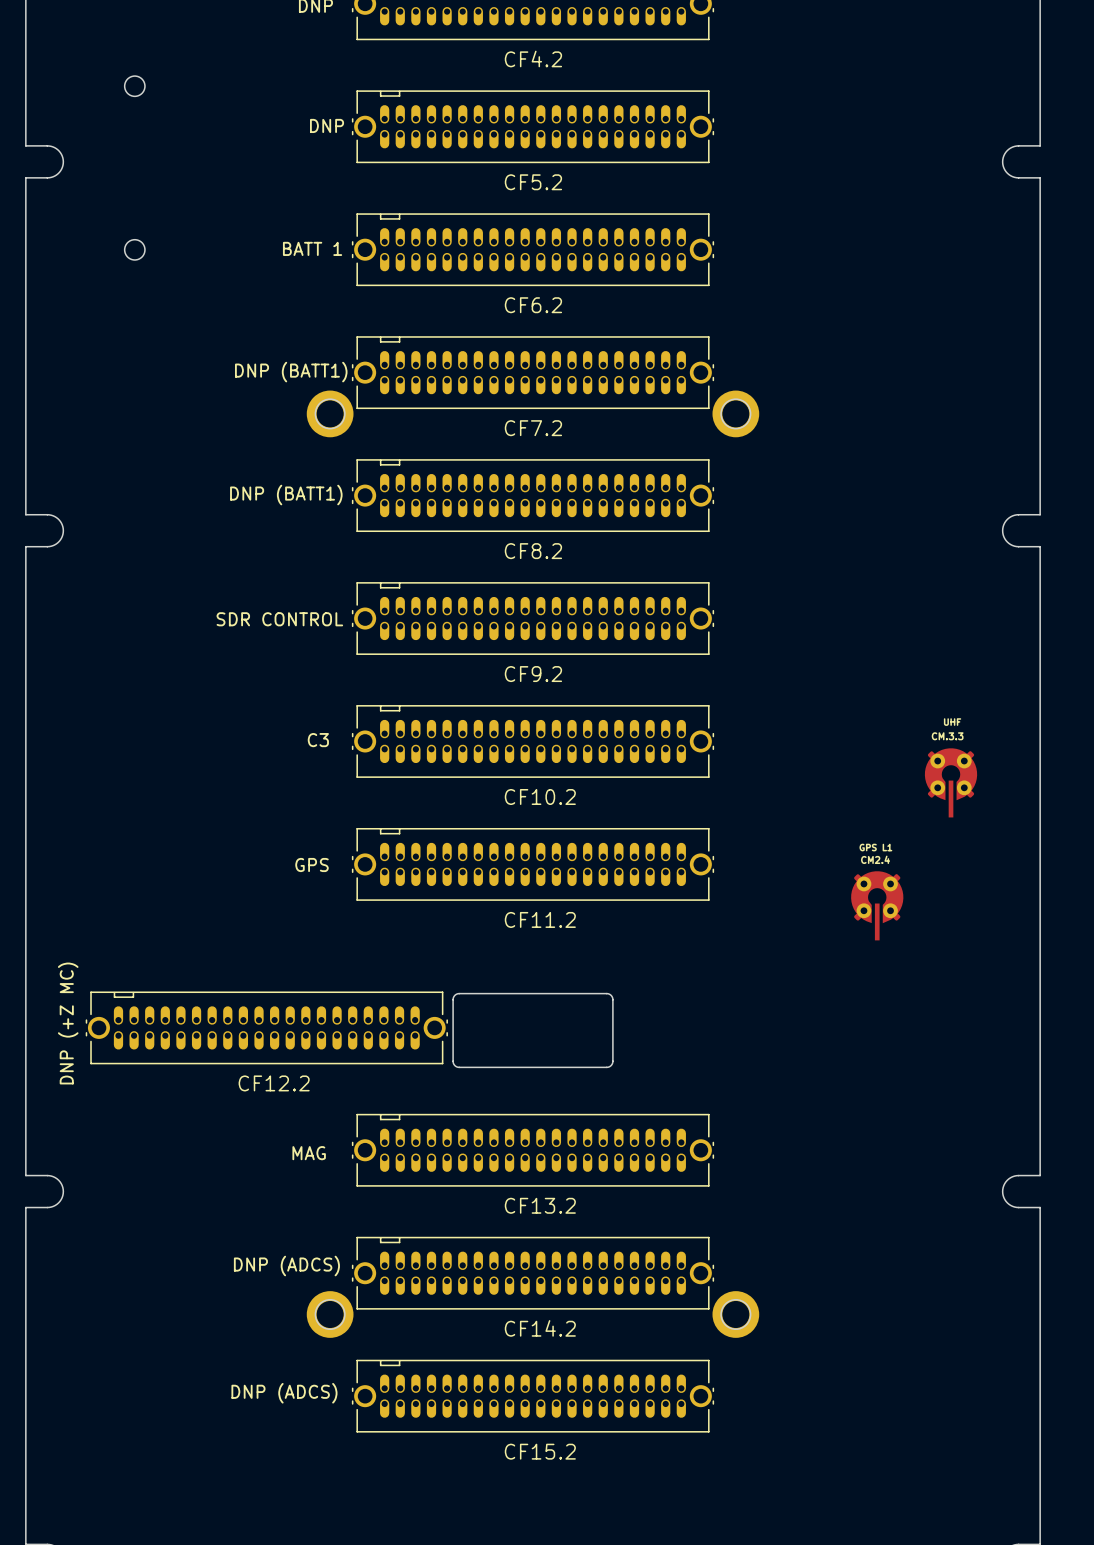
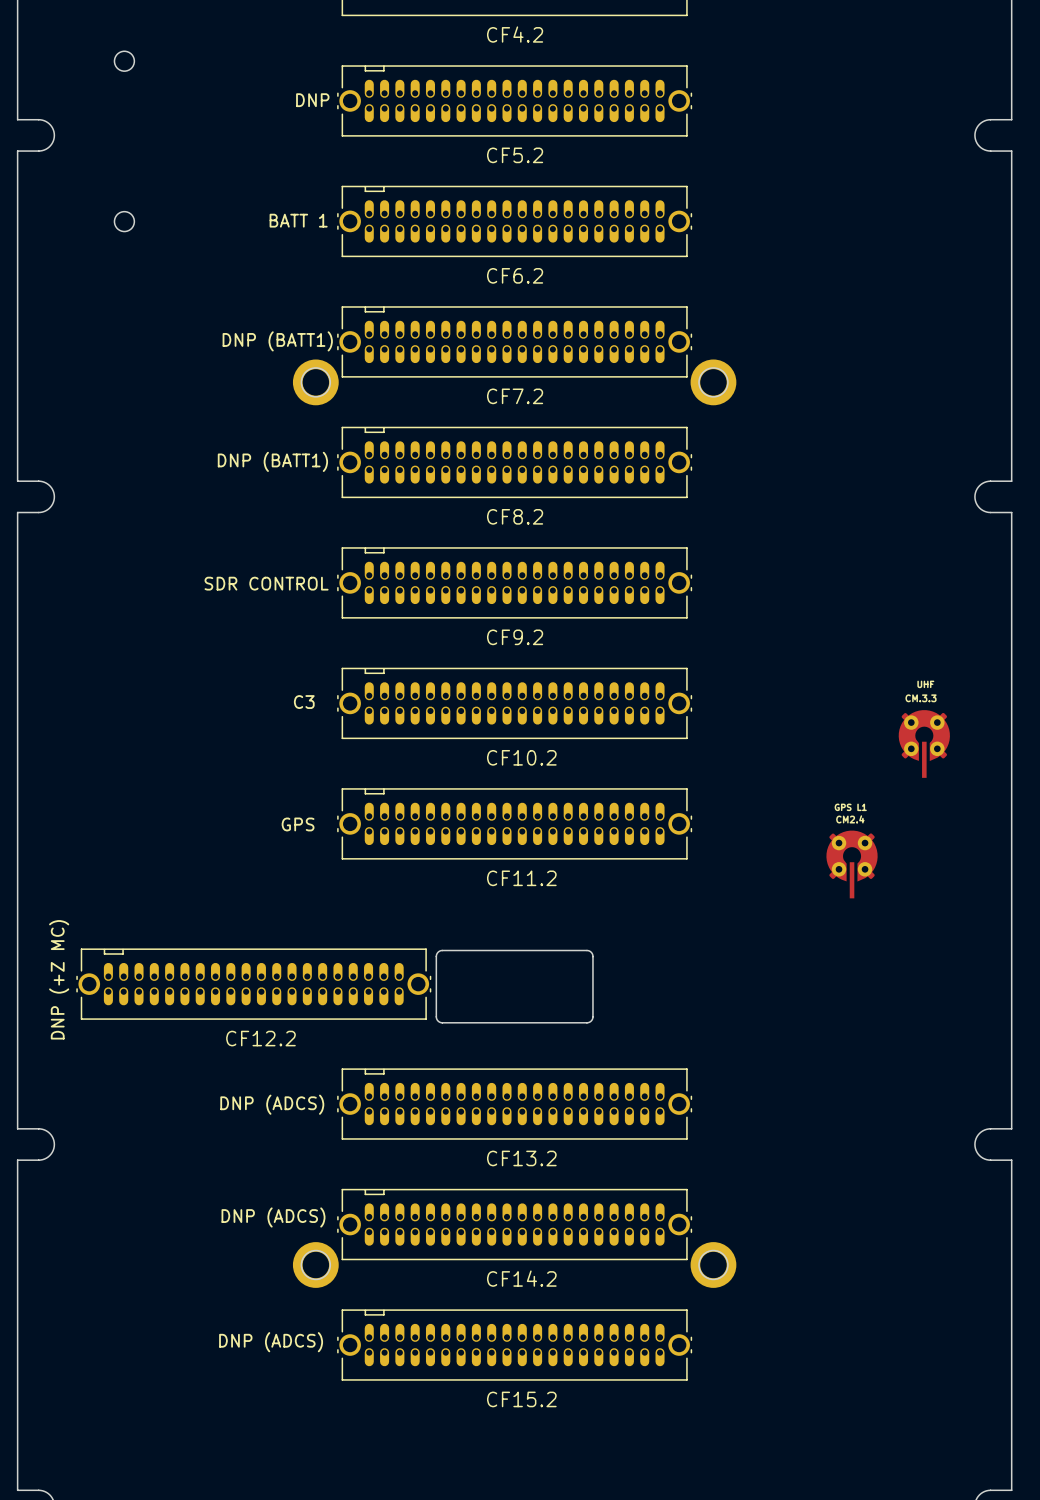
text: none -> DNP (ADCS) (272, 1104)
text: MAG (309, 1153) -> none

